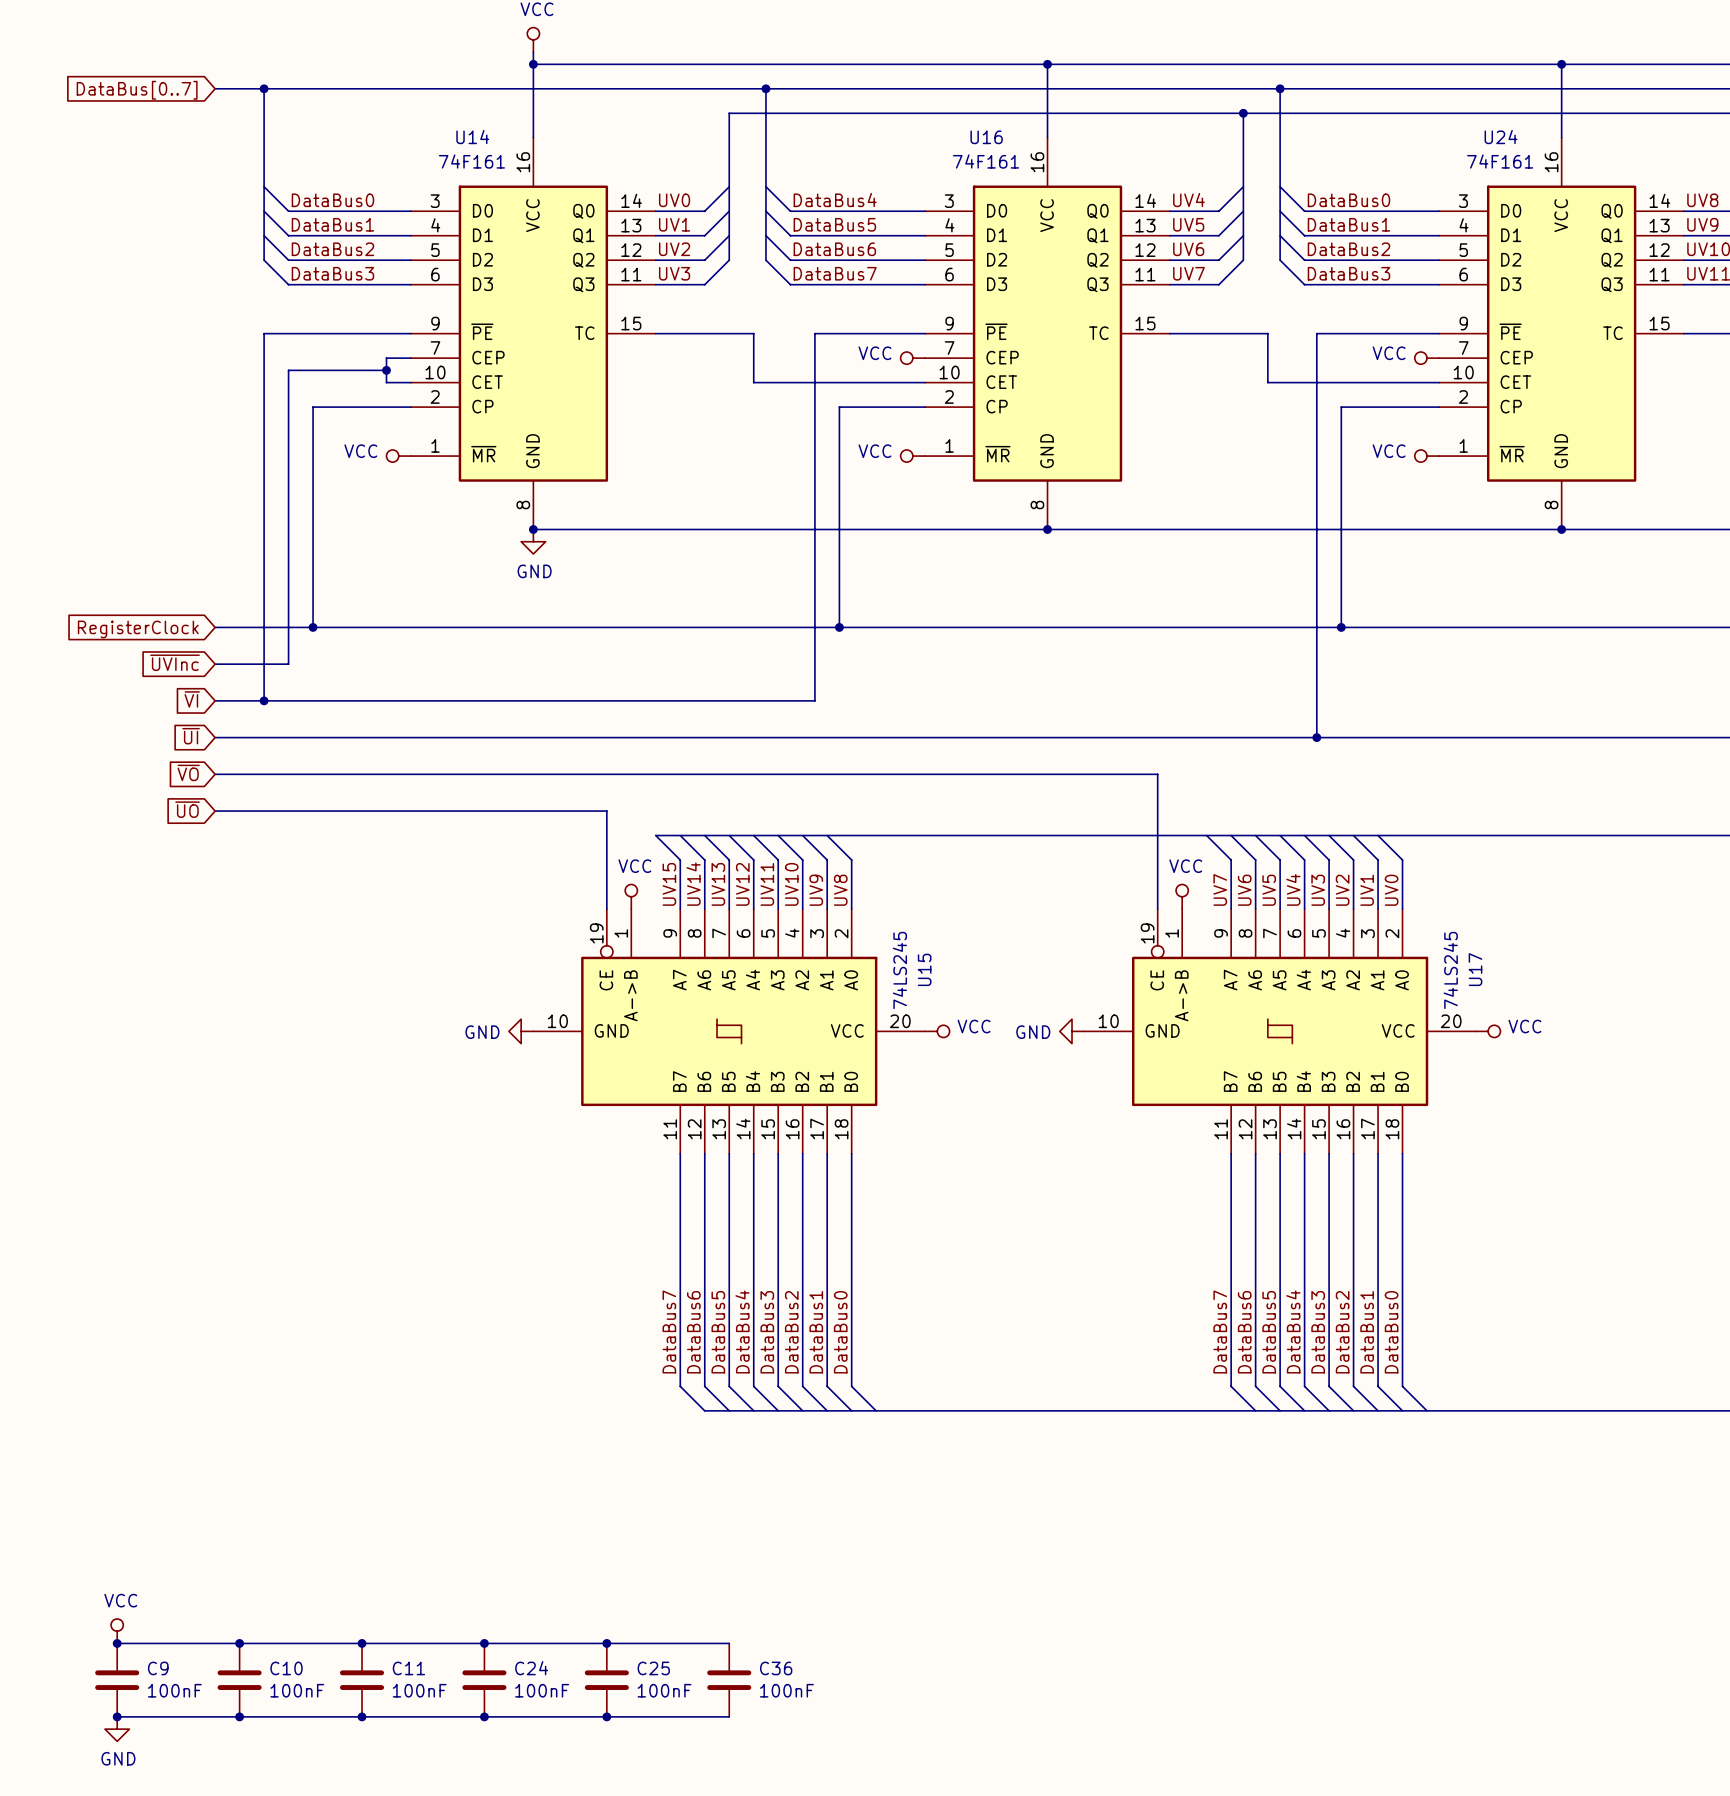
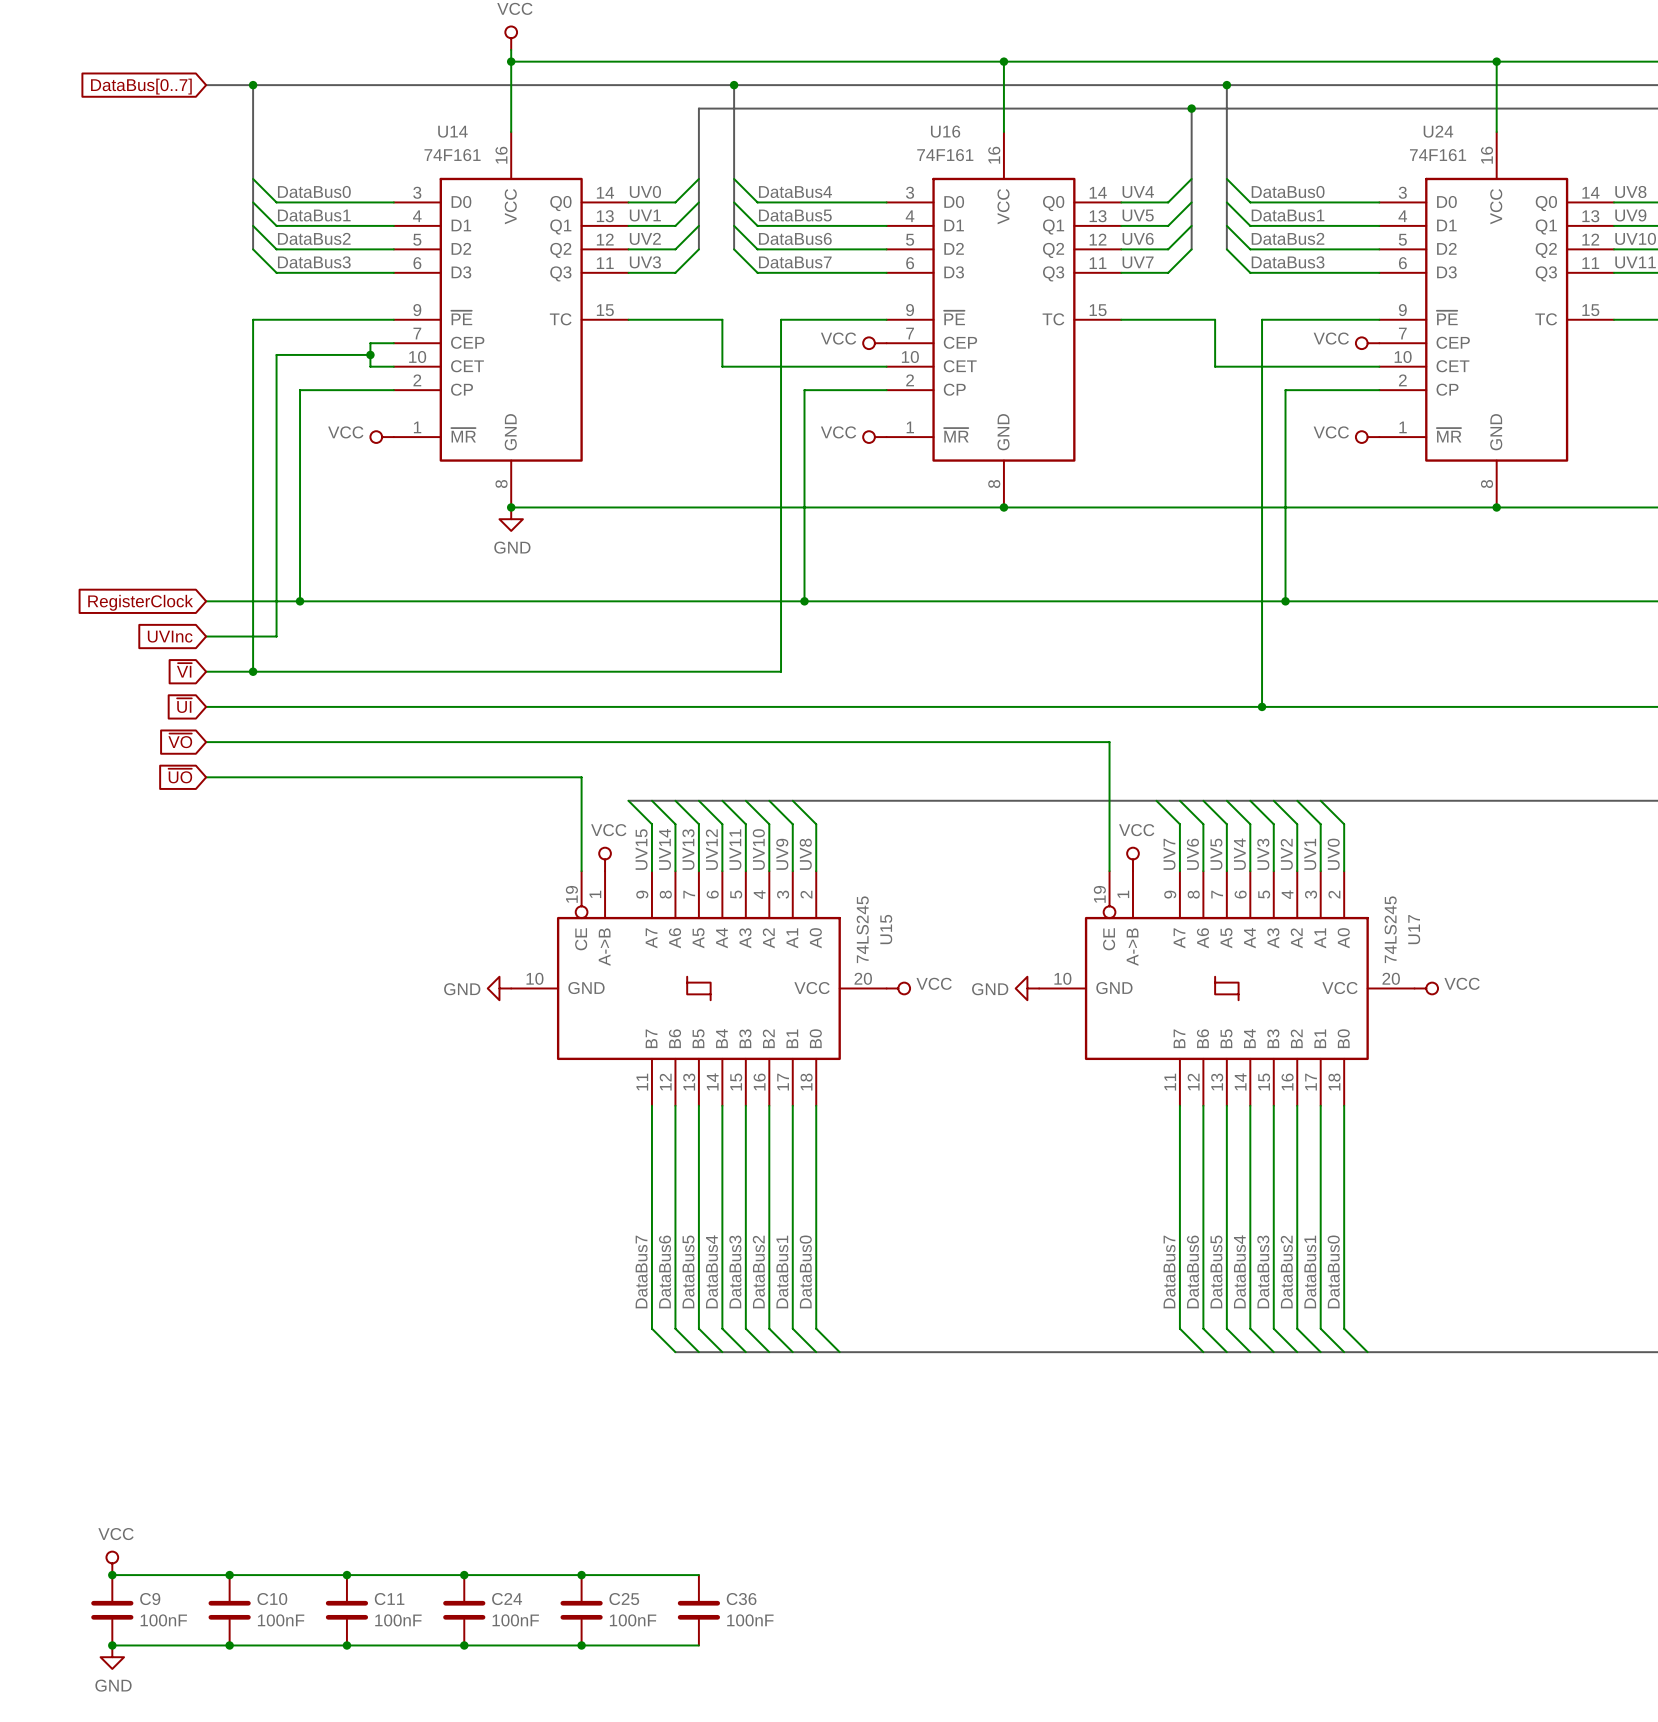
global label: ~{UVInc} (175, 662) -> UVInc (170, 636)

